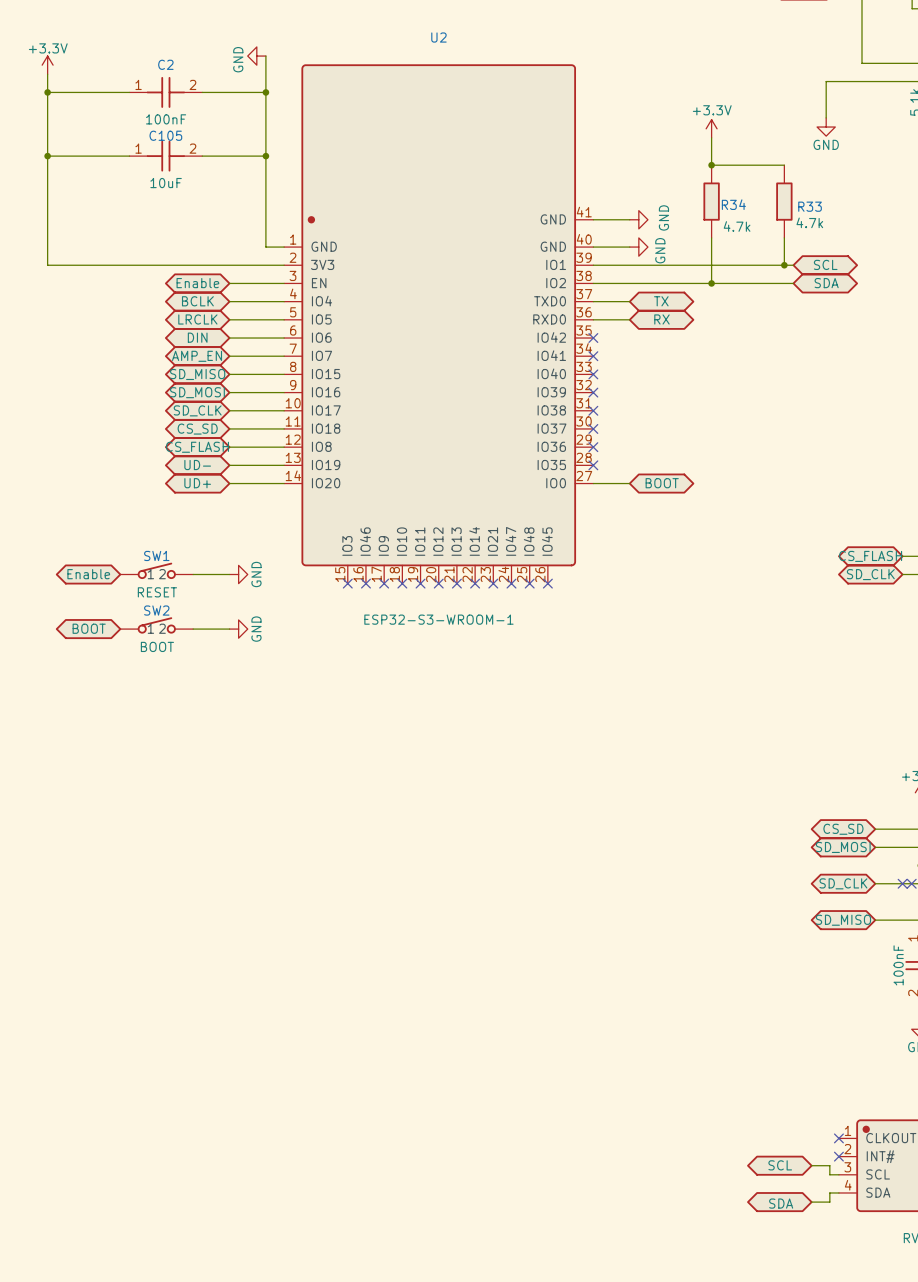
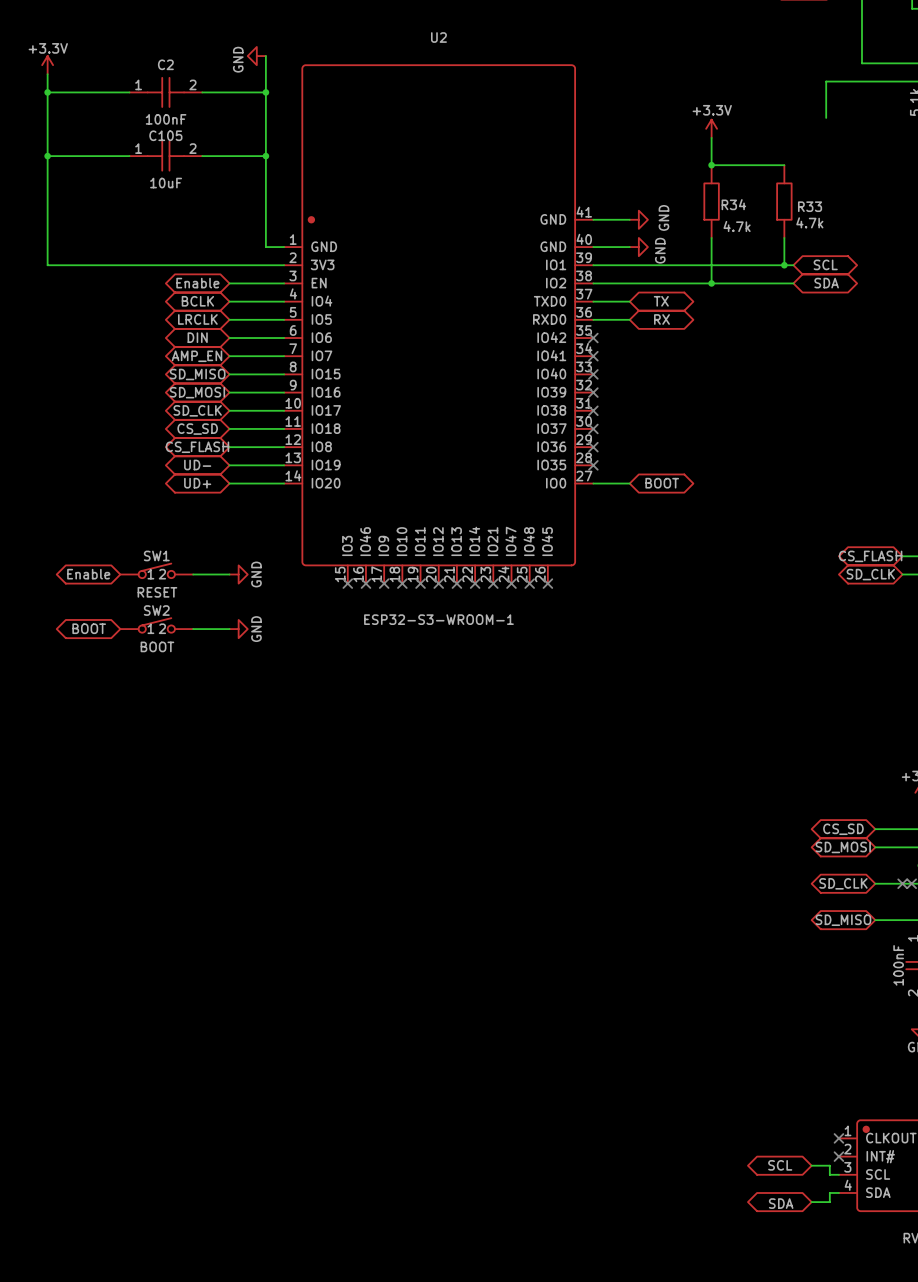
power symbol: GND (826, 127) -> none

